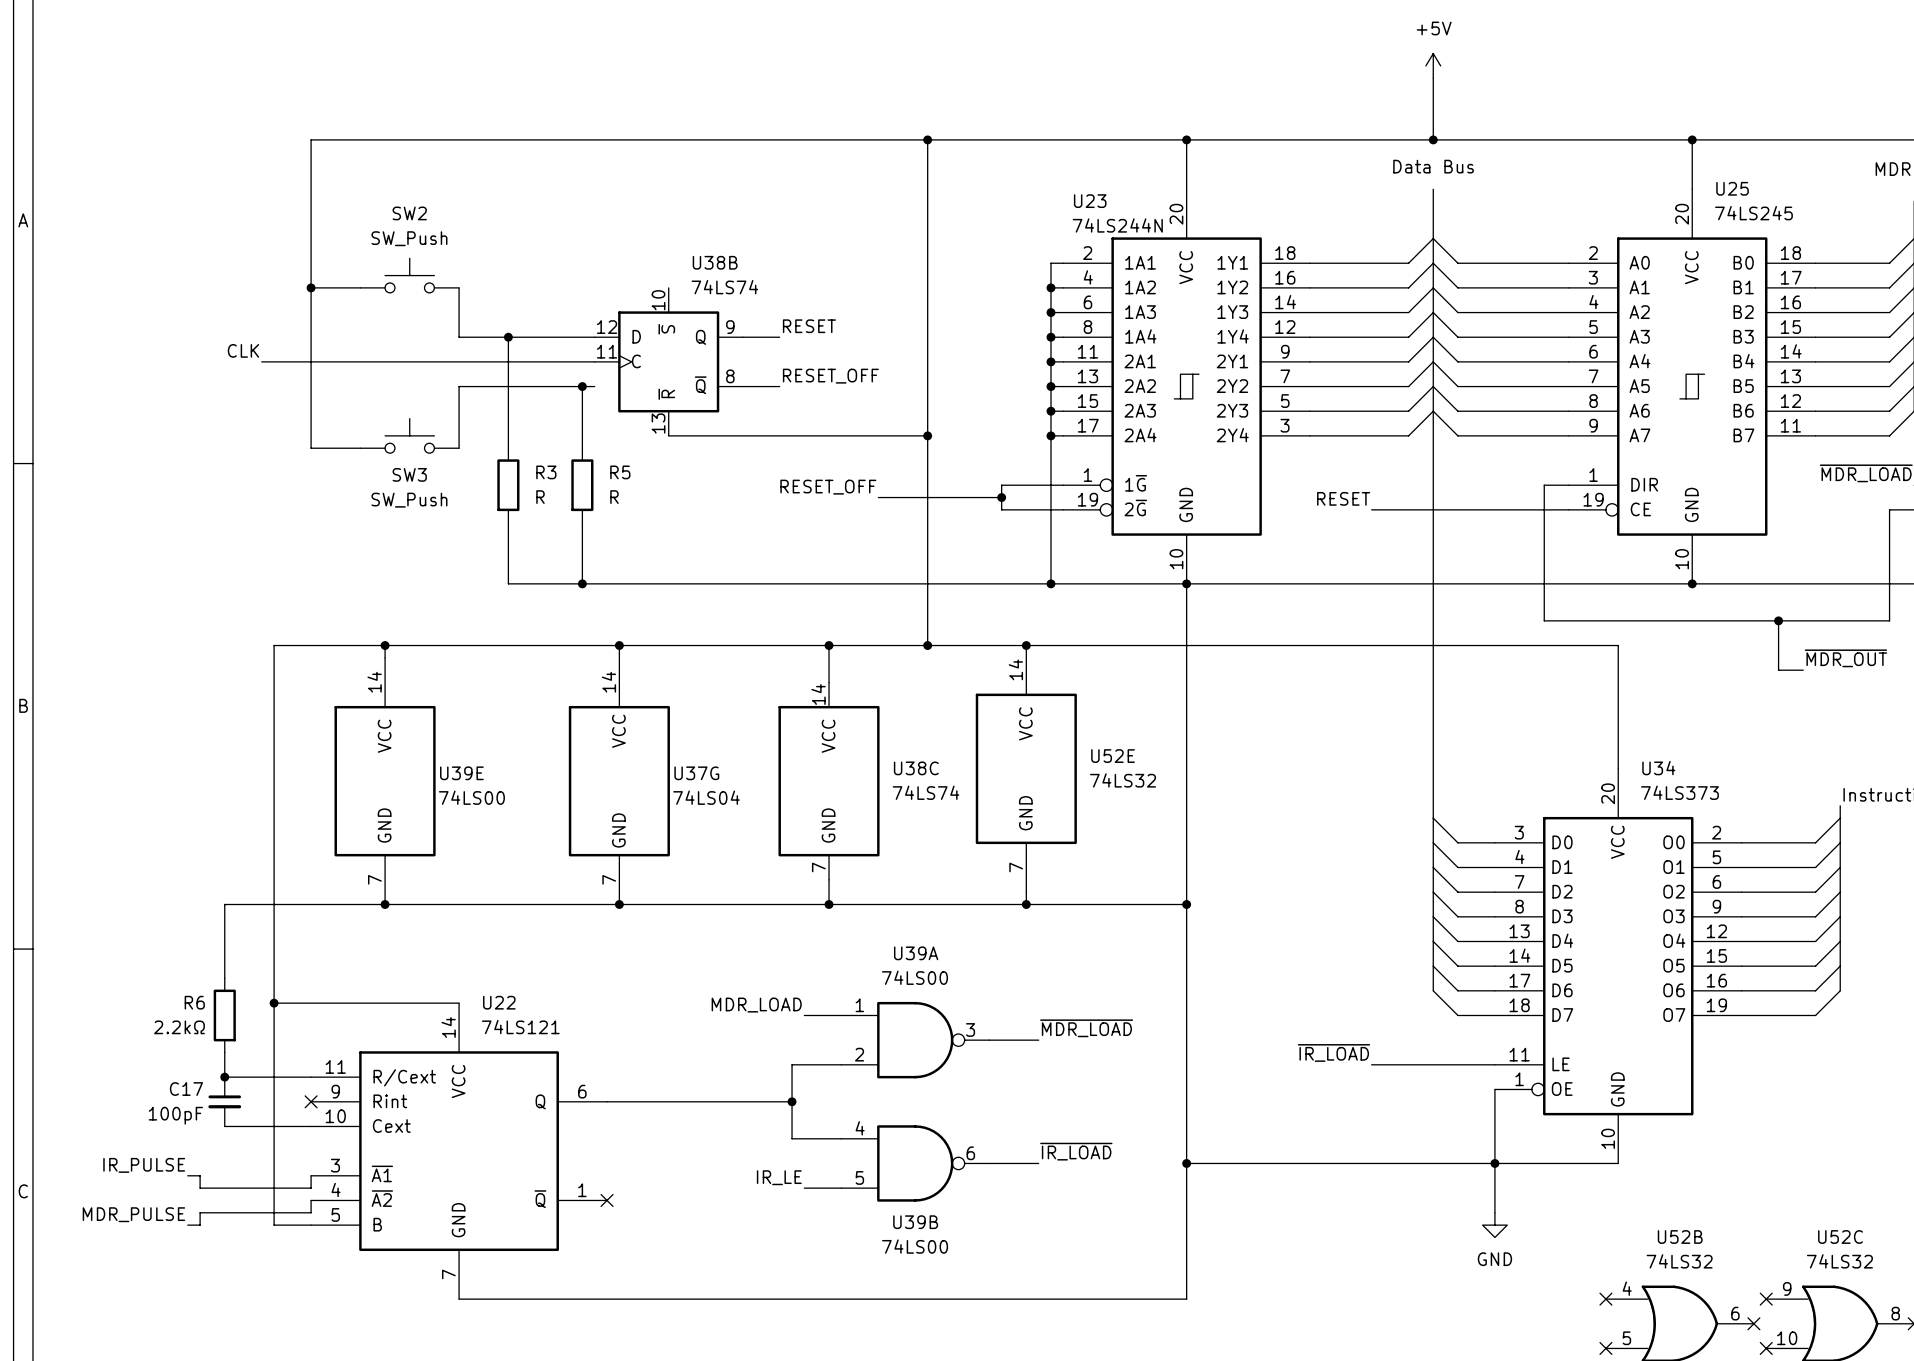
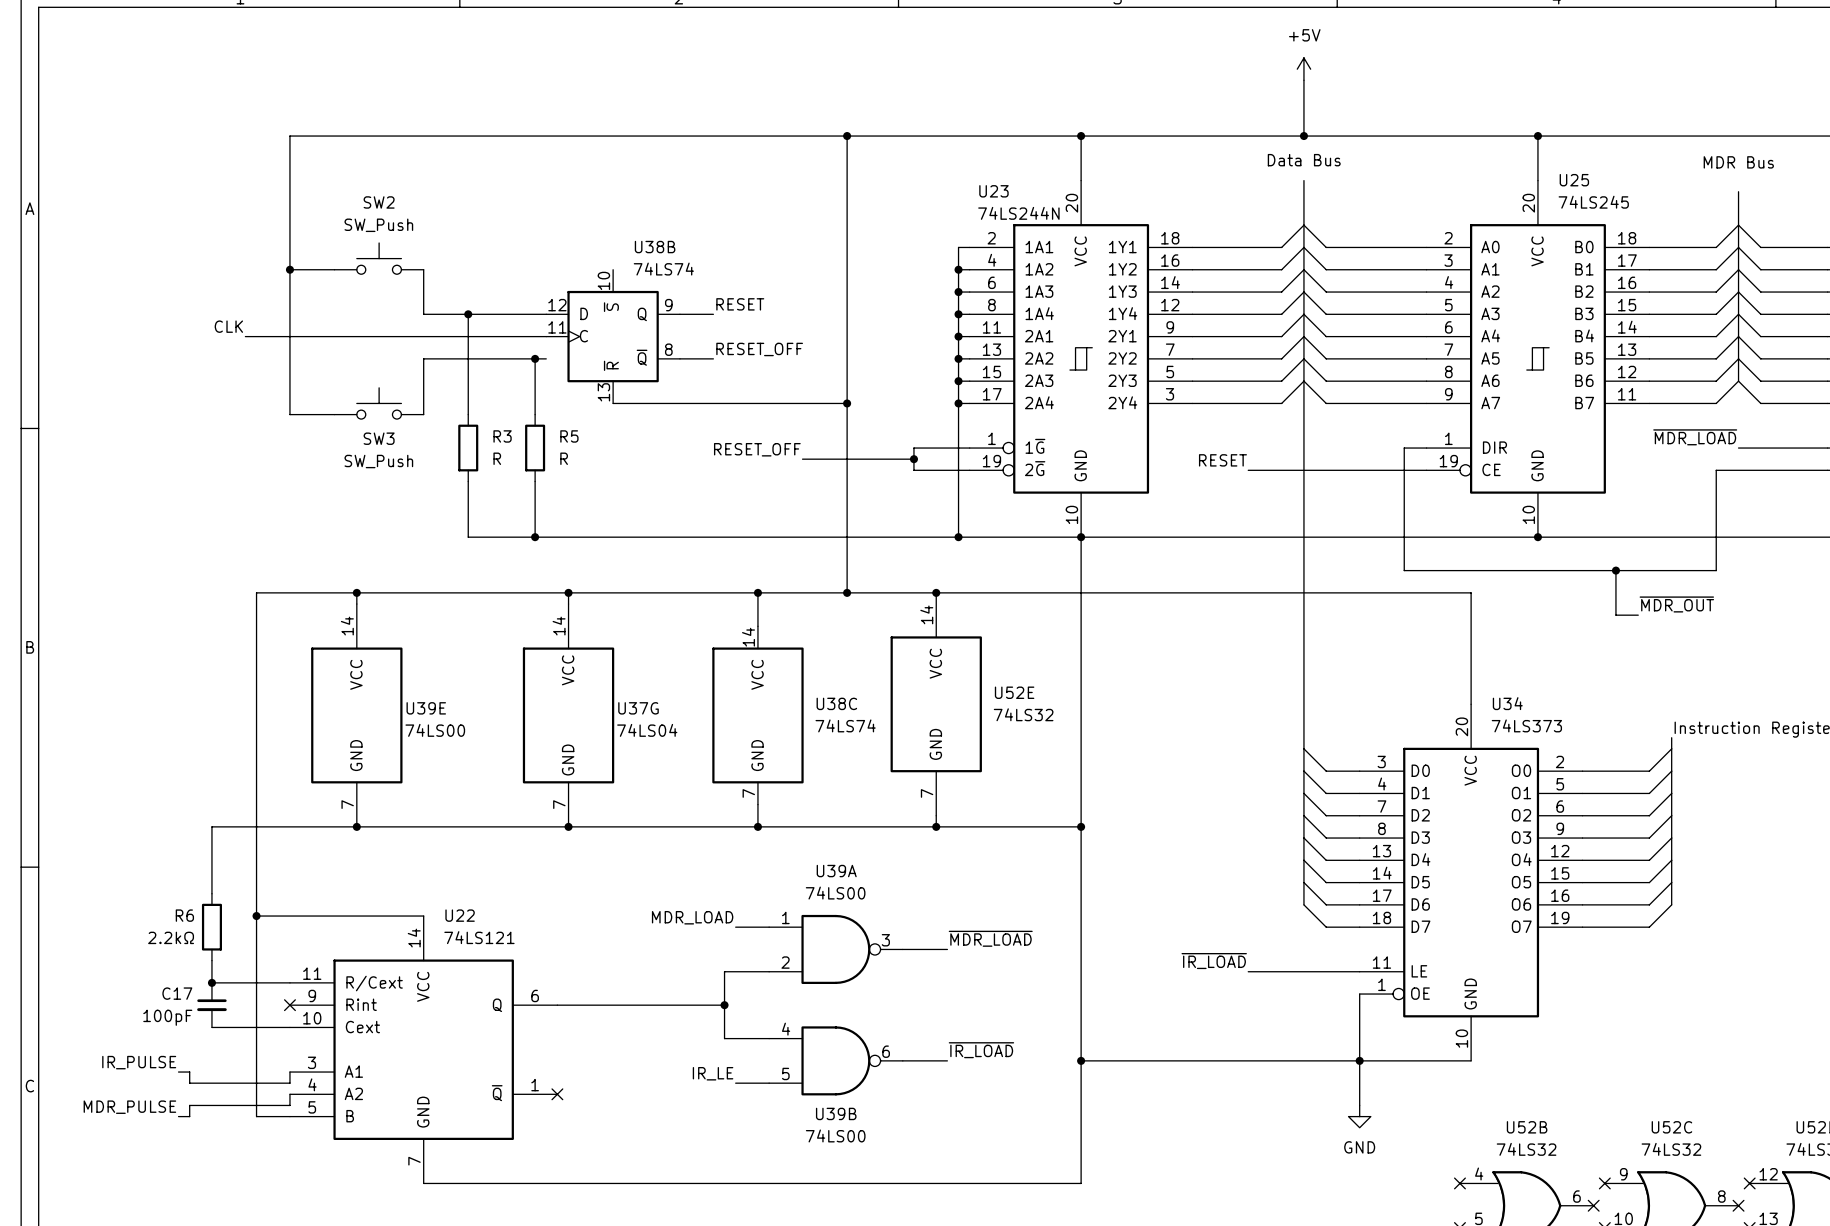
U22 pin name: ~{A1} (382, 1173) -> A1 (353, 1071)
U22 pin name: ~{A2} (382, 1198) -> A2 (353, 1093)

